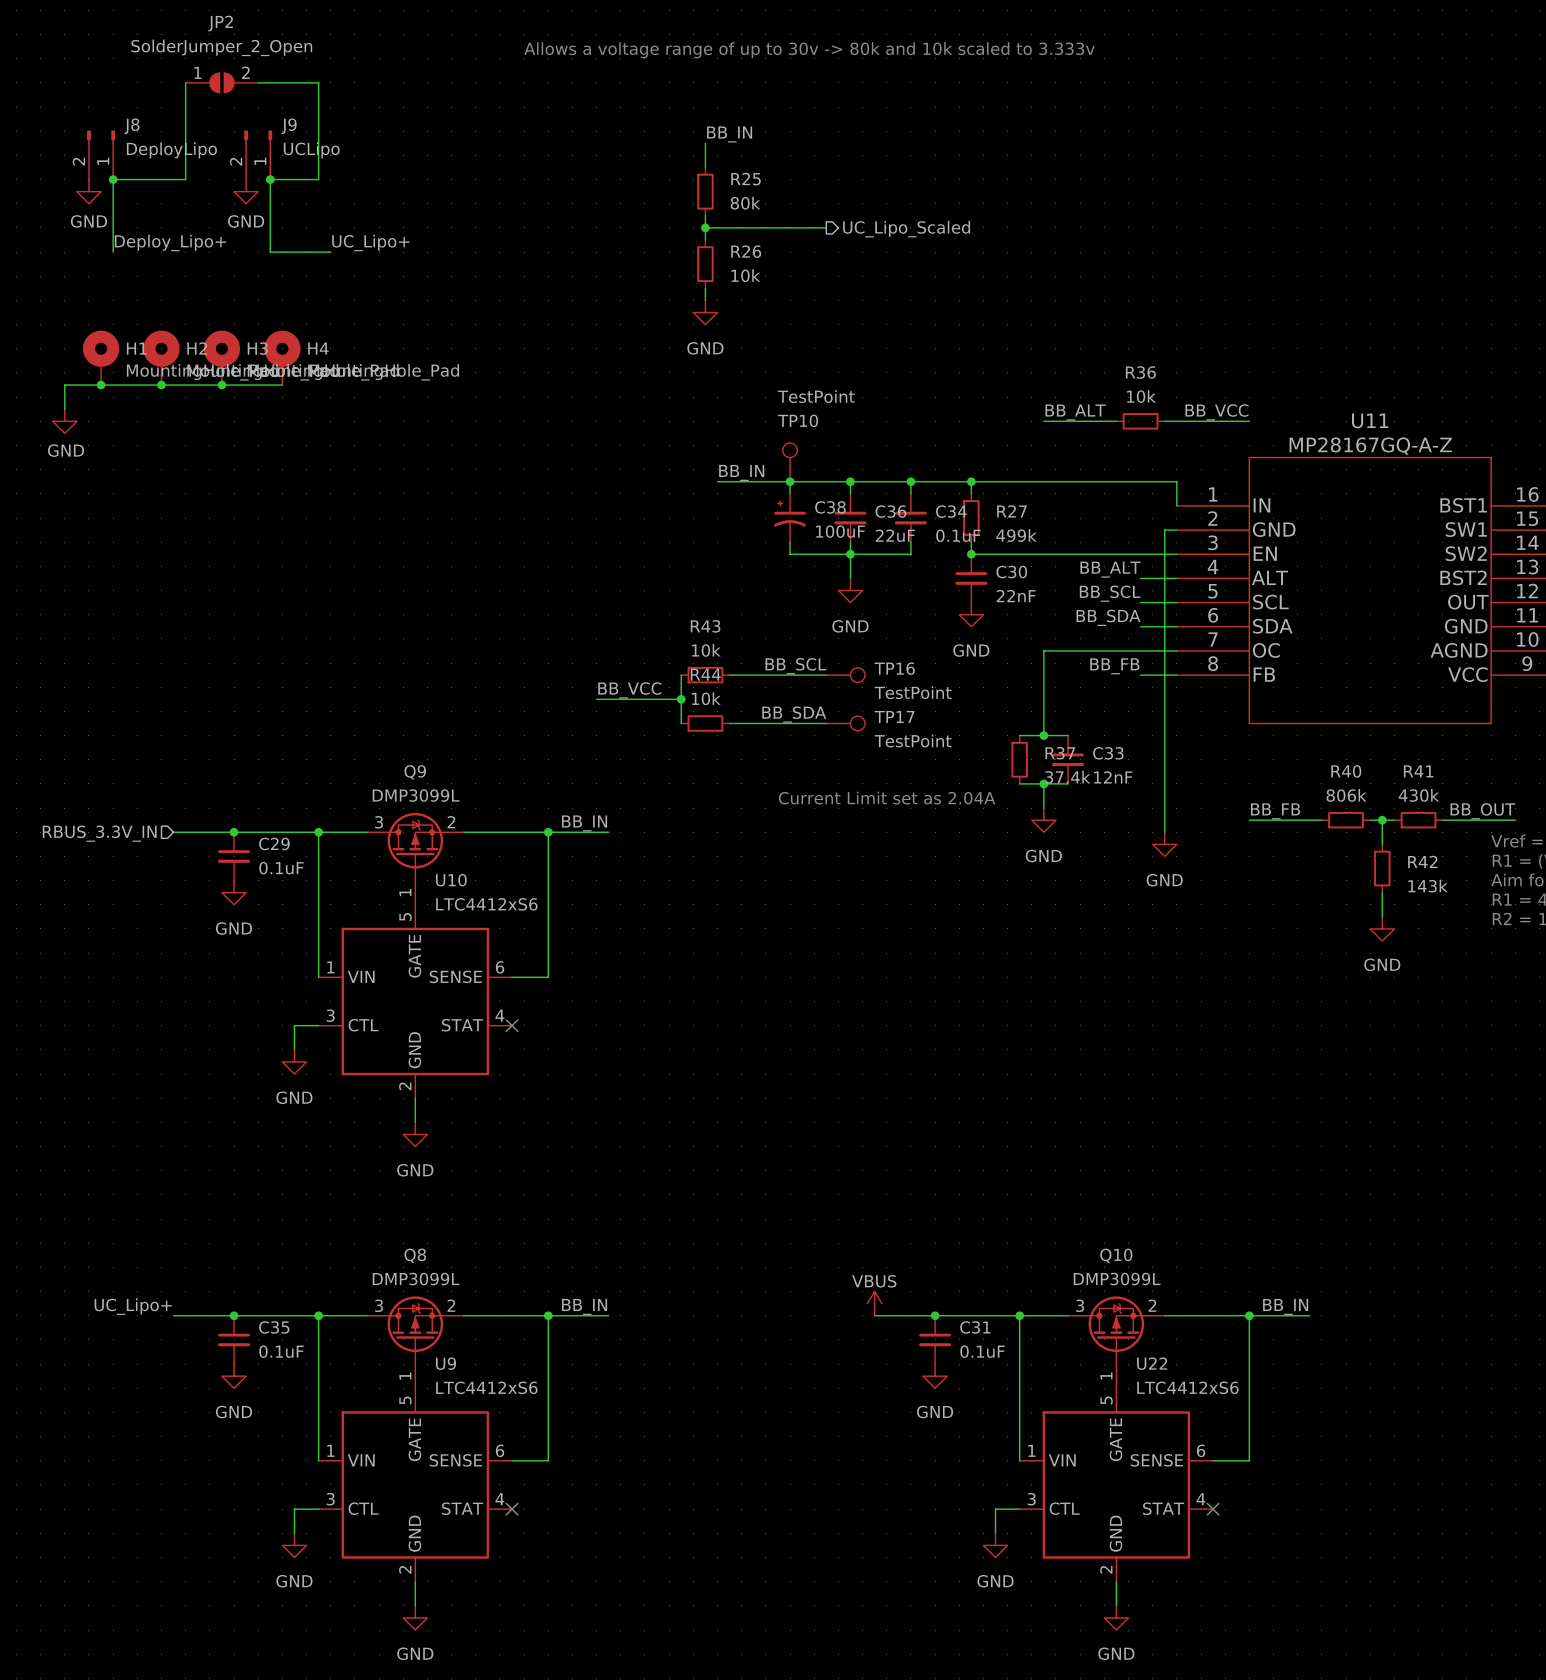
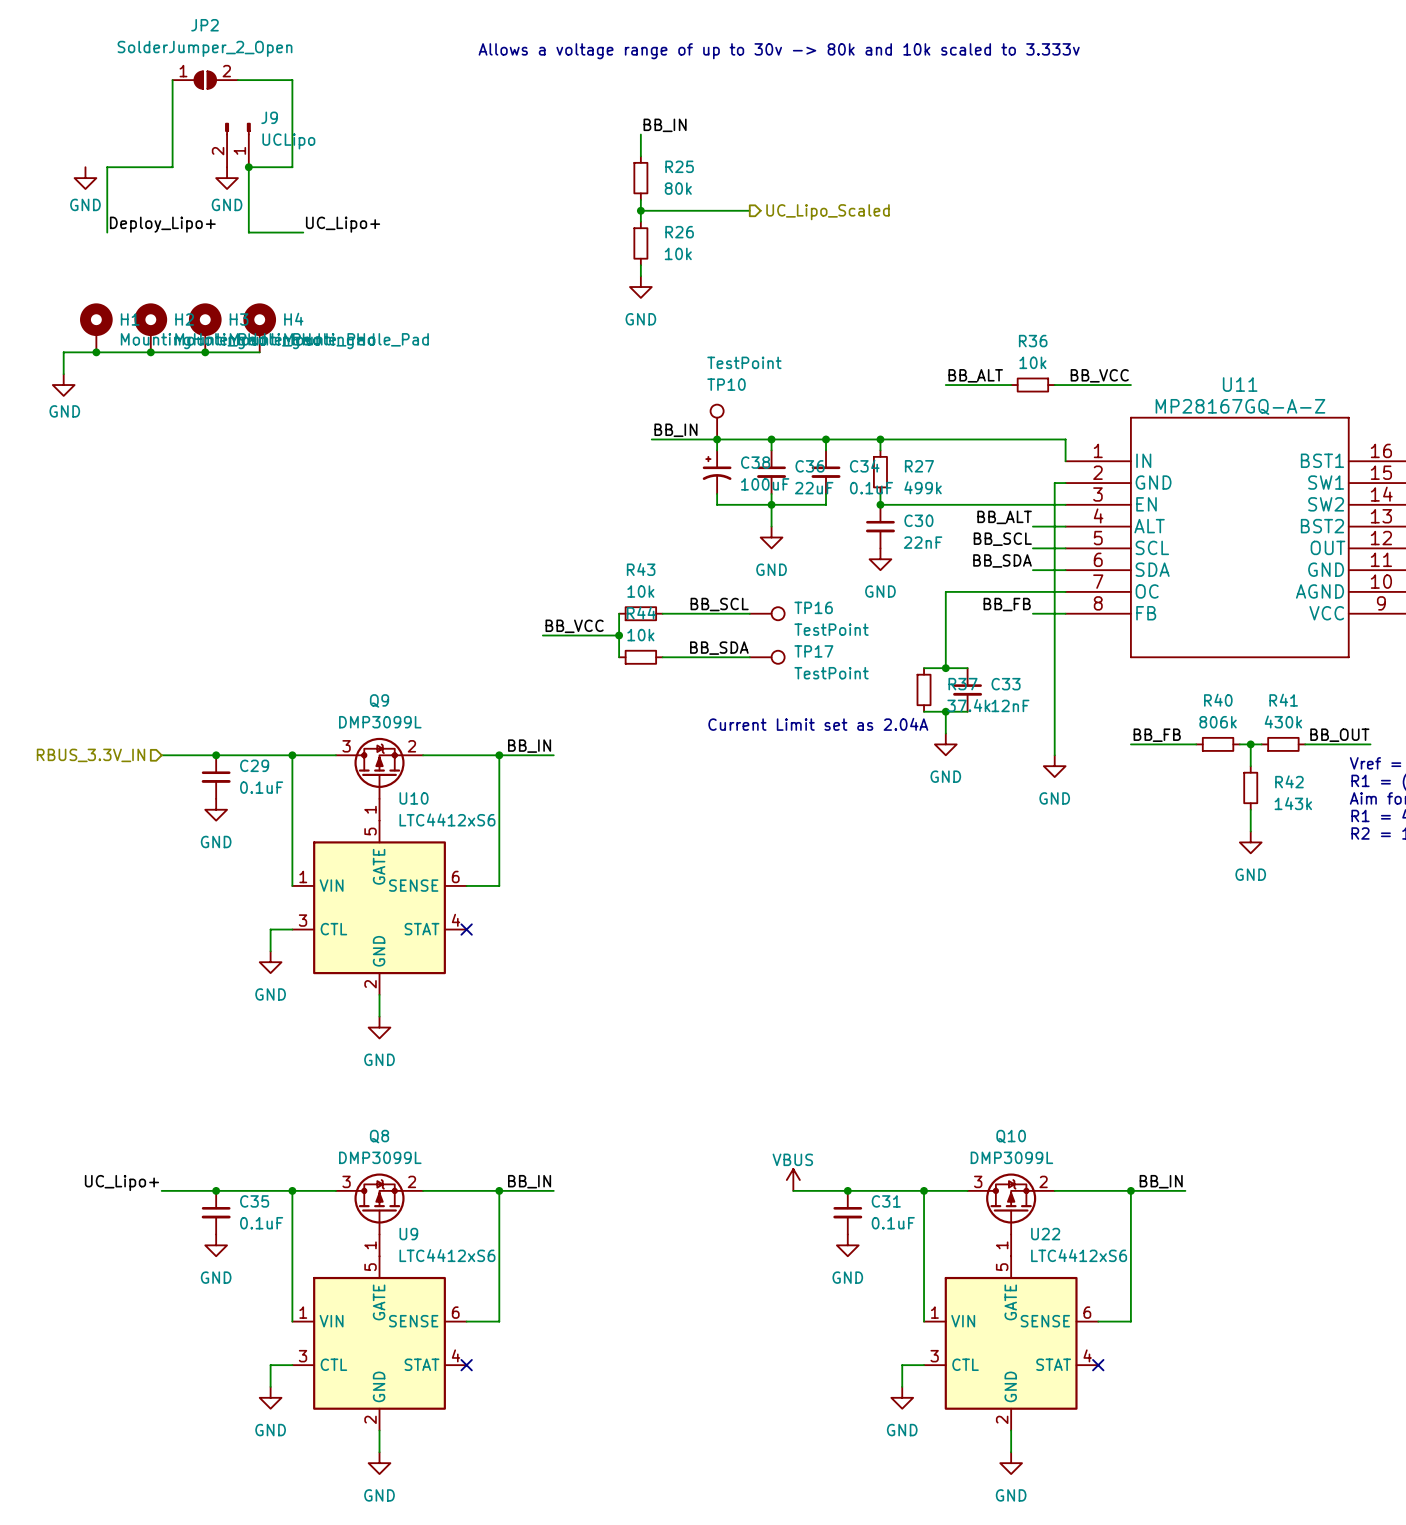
J8: DeployLipo (101, 155) -> none
junction: (113, 179) -> none

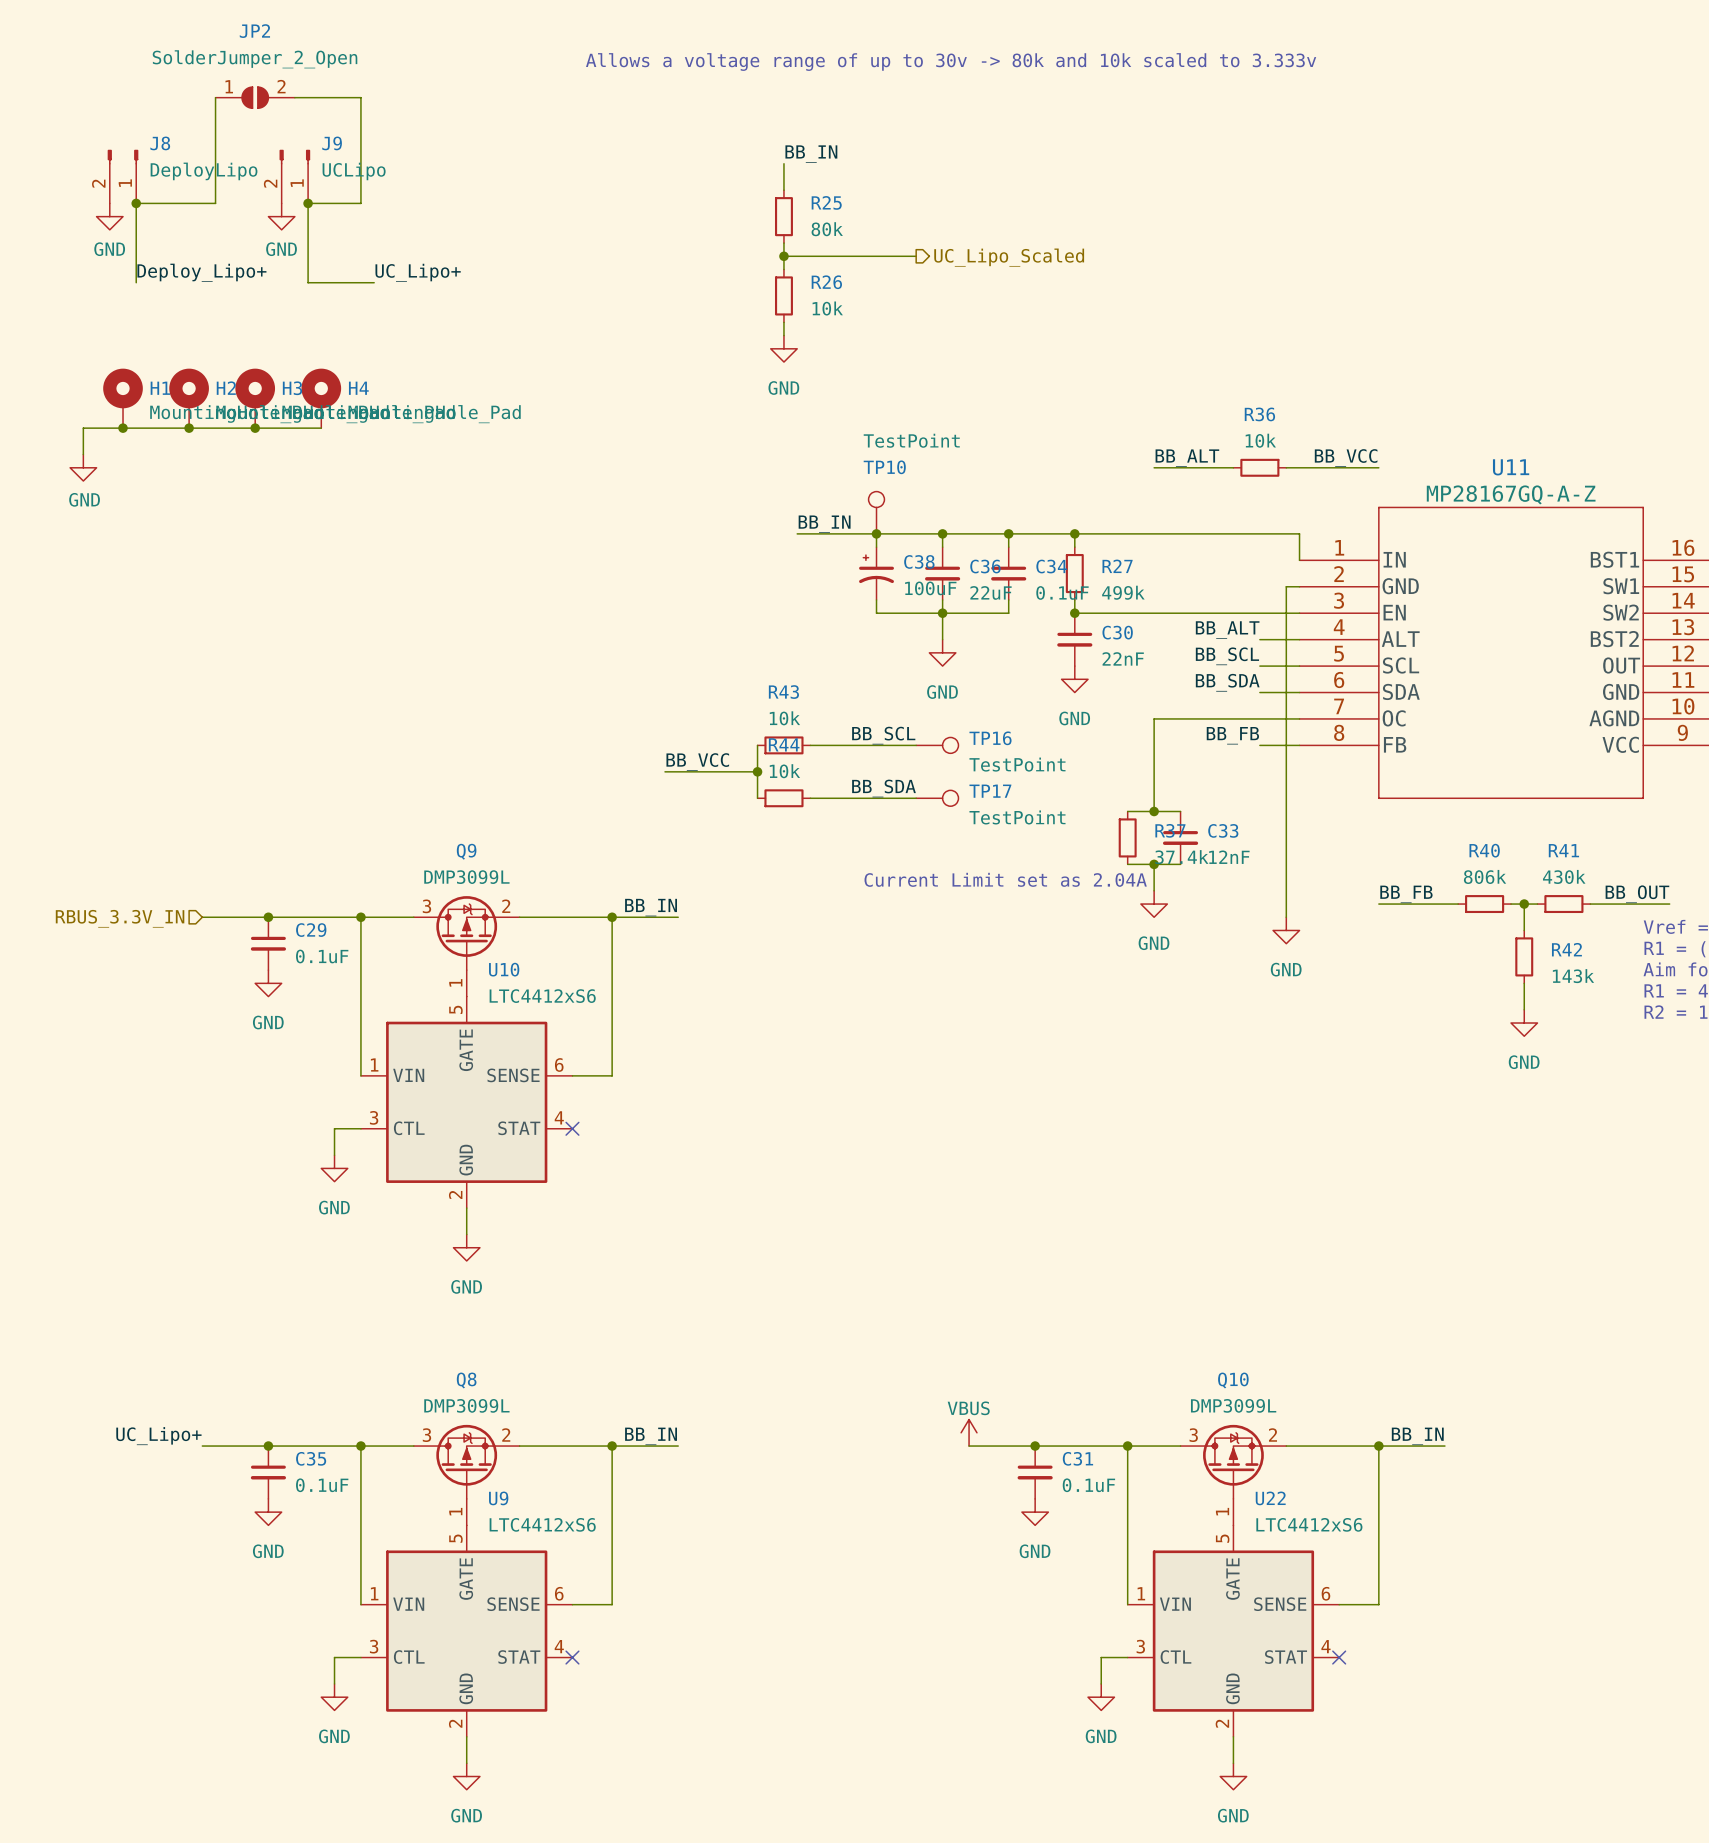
J8: none -> DeployLipo (123, 176)
junction: none -> (136, 203)

